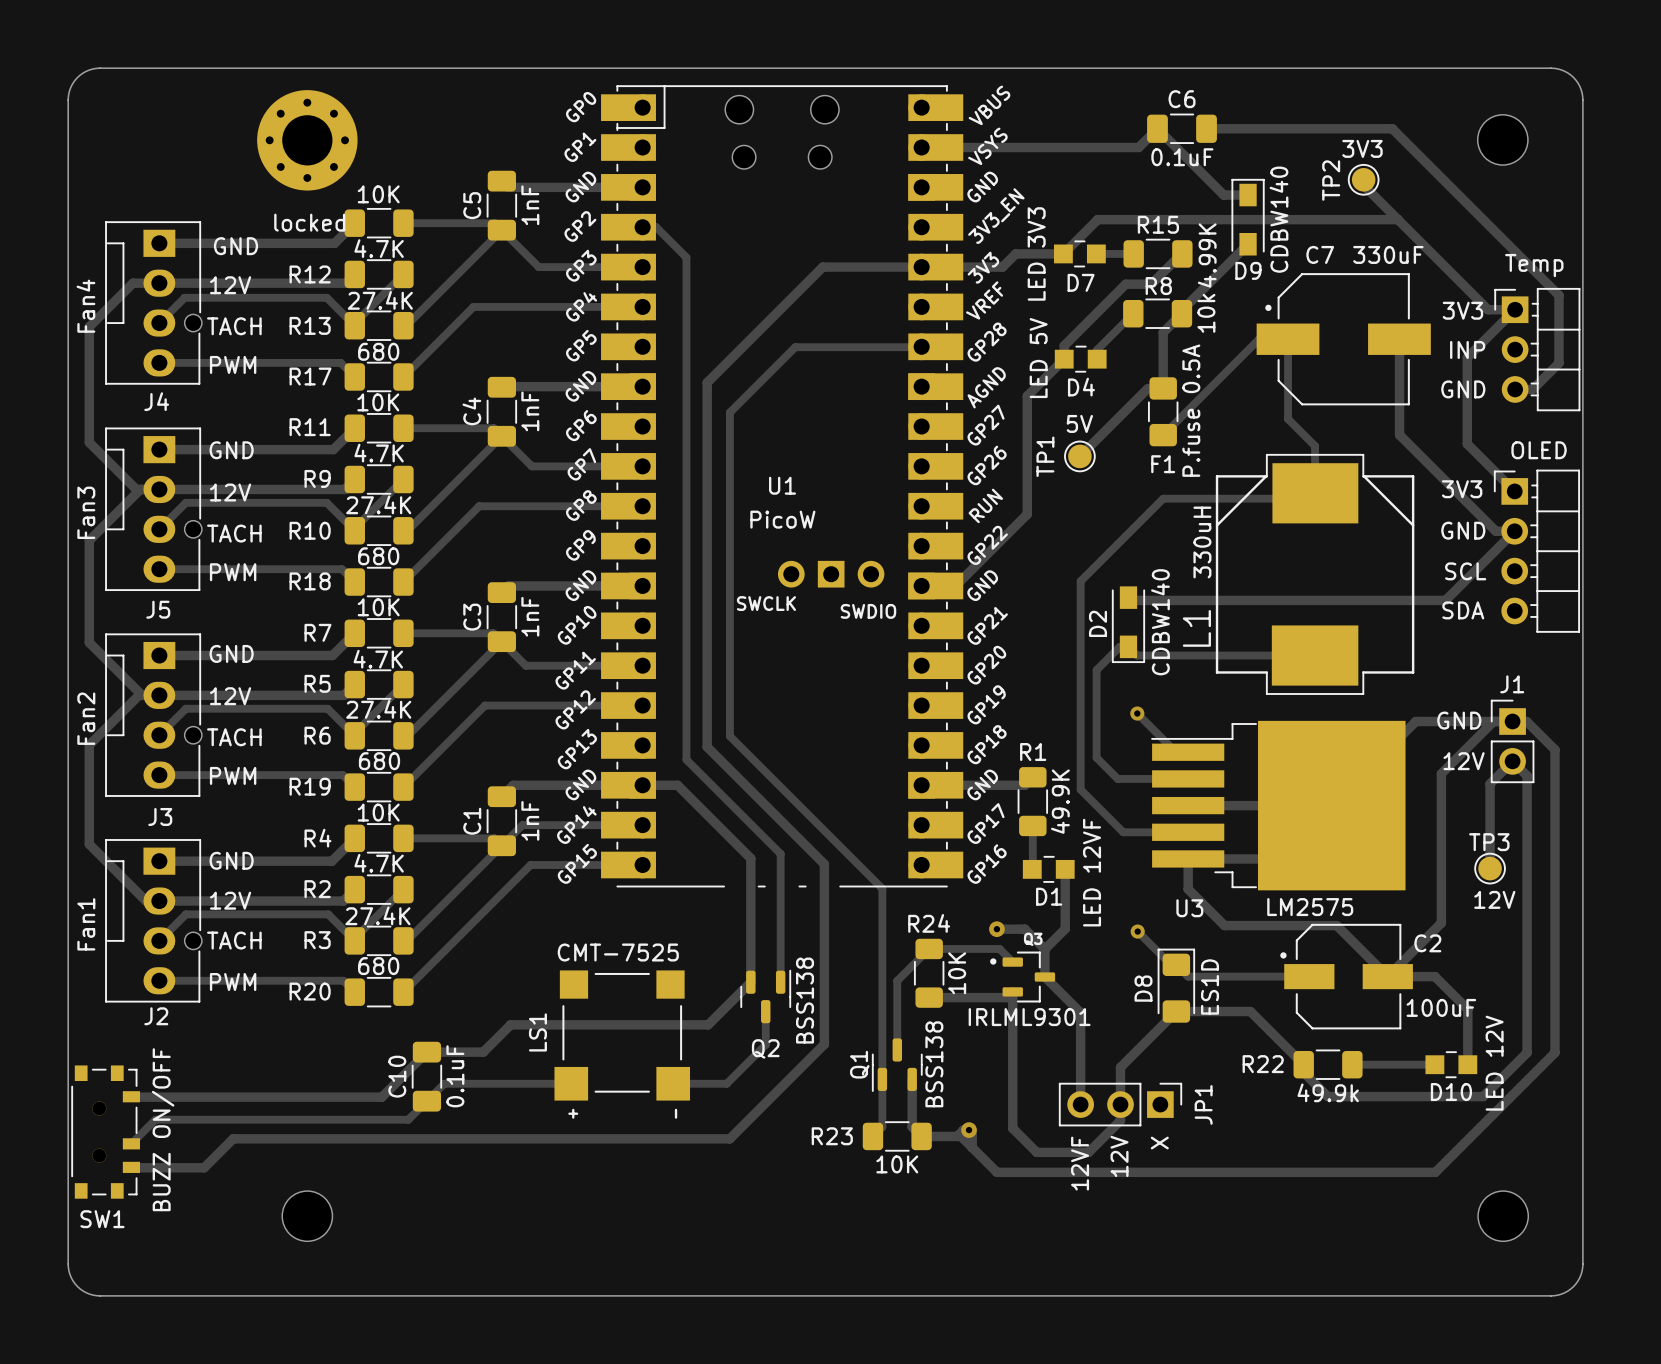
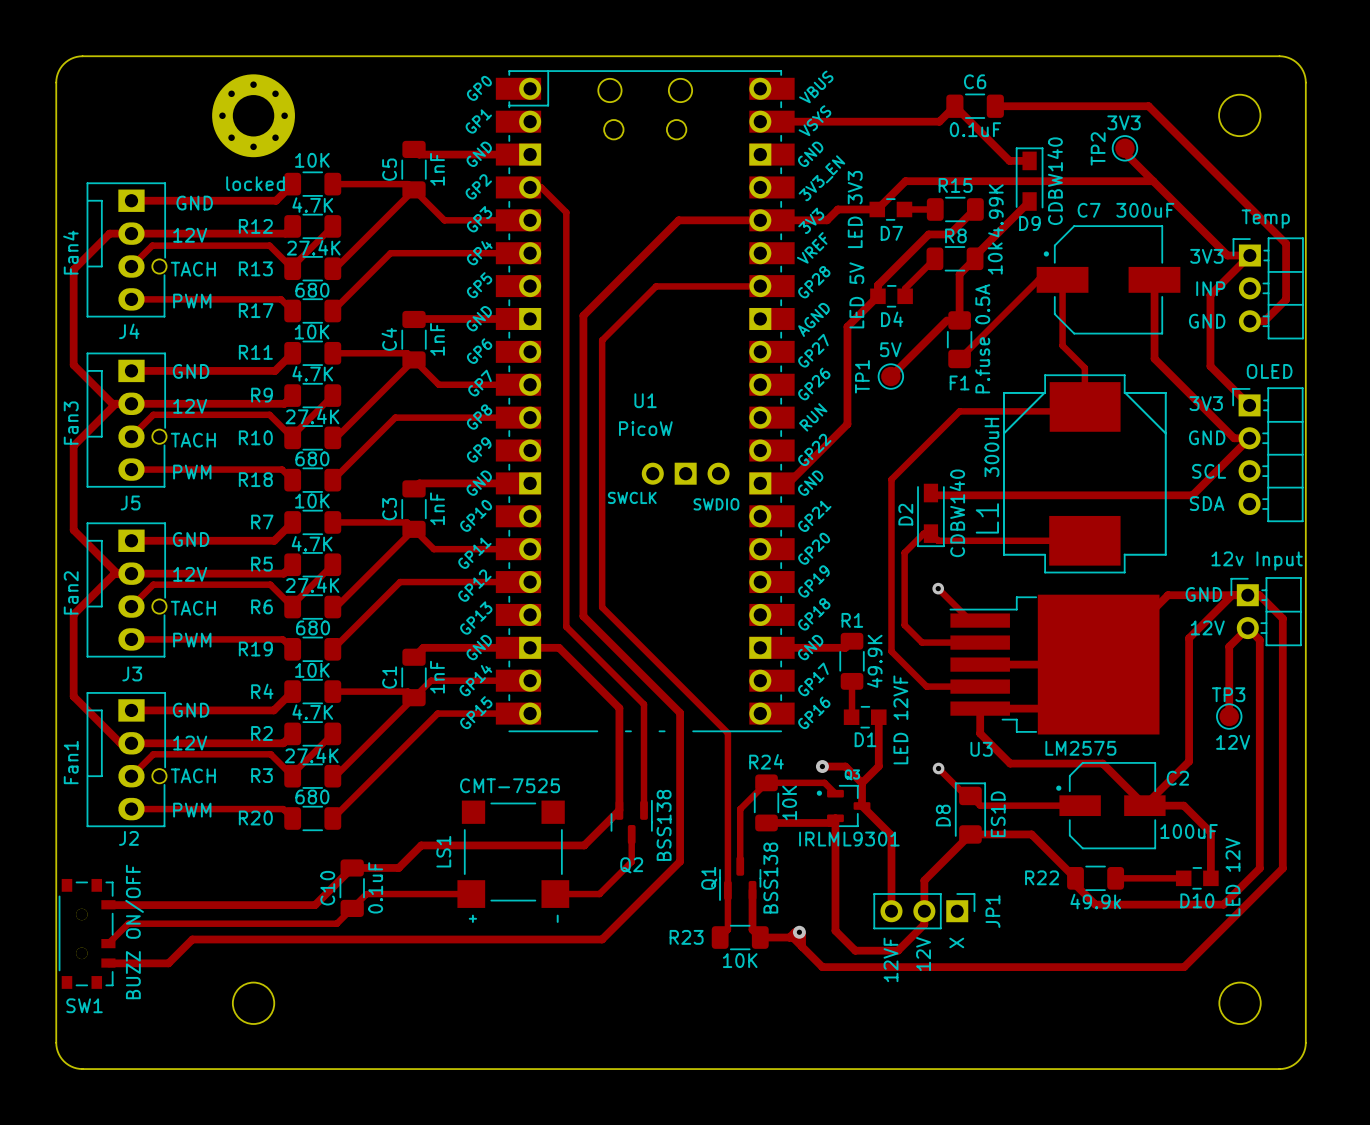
C7 value: 330uF (1388, 254) -> 300uF (1145, 210)
L1 value: 330uH (1202, 542) -> 300uH (991, 447)
J1: (1512, 741) -> none
part: none -> 12v Input (1266, 611)

